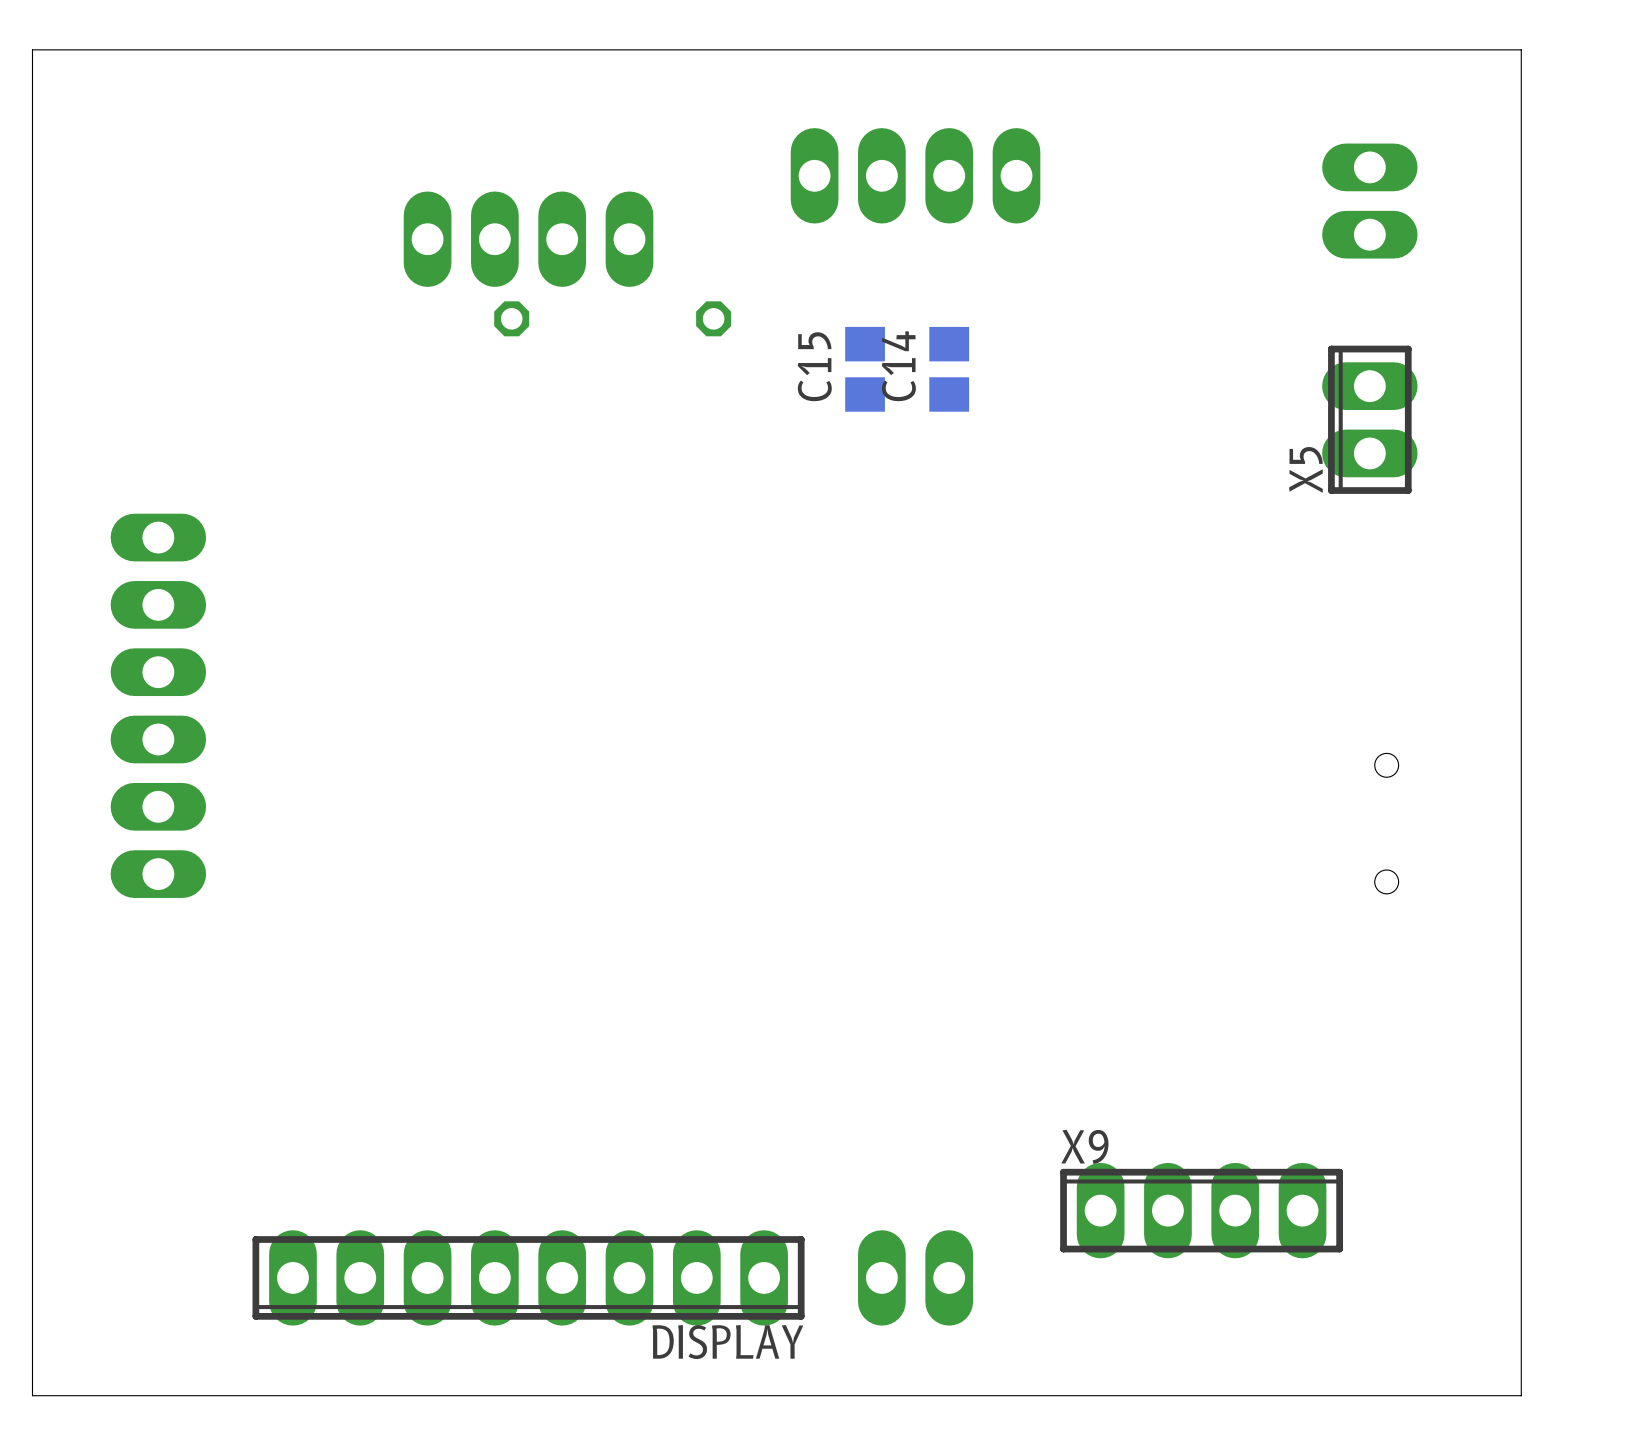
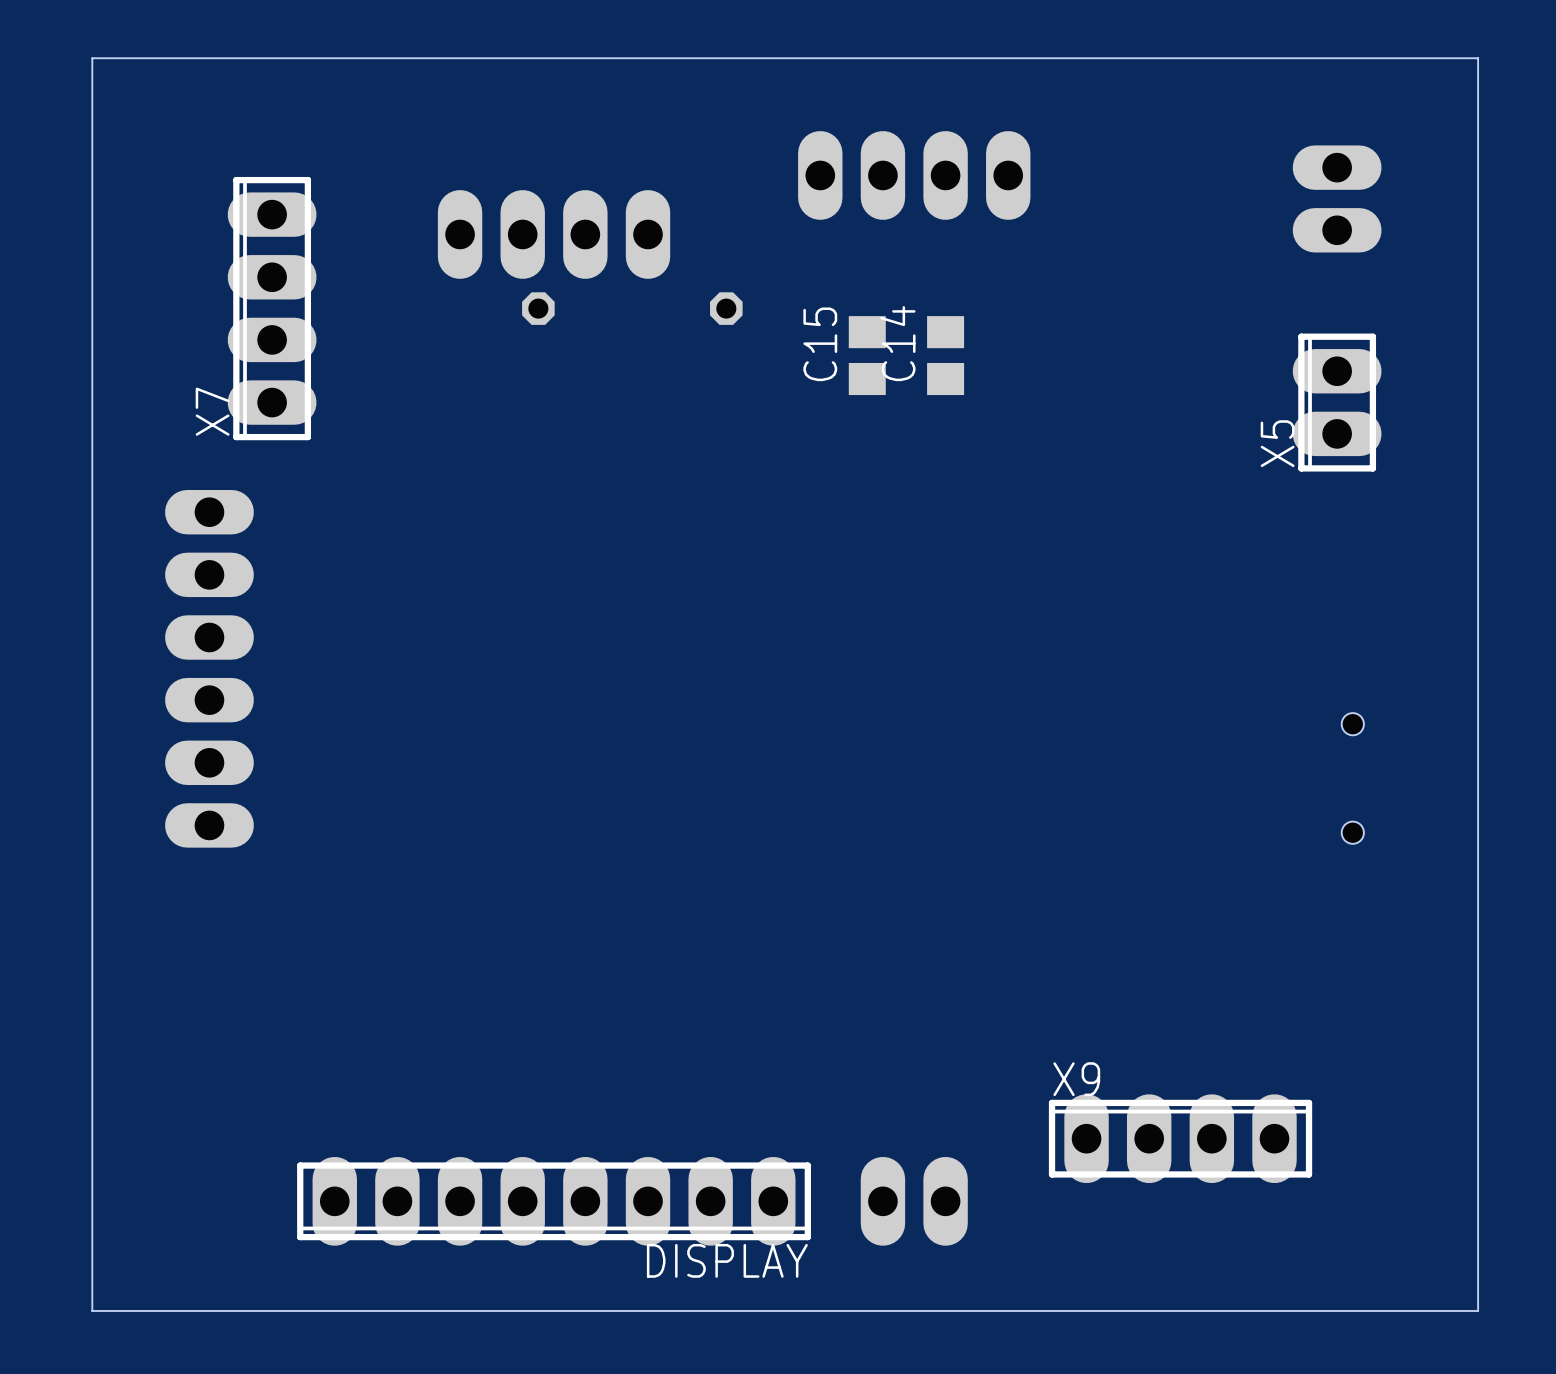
X7: none -> (272, 308)

